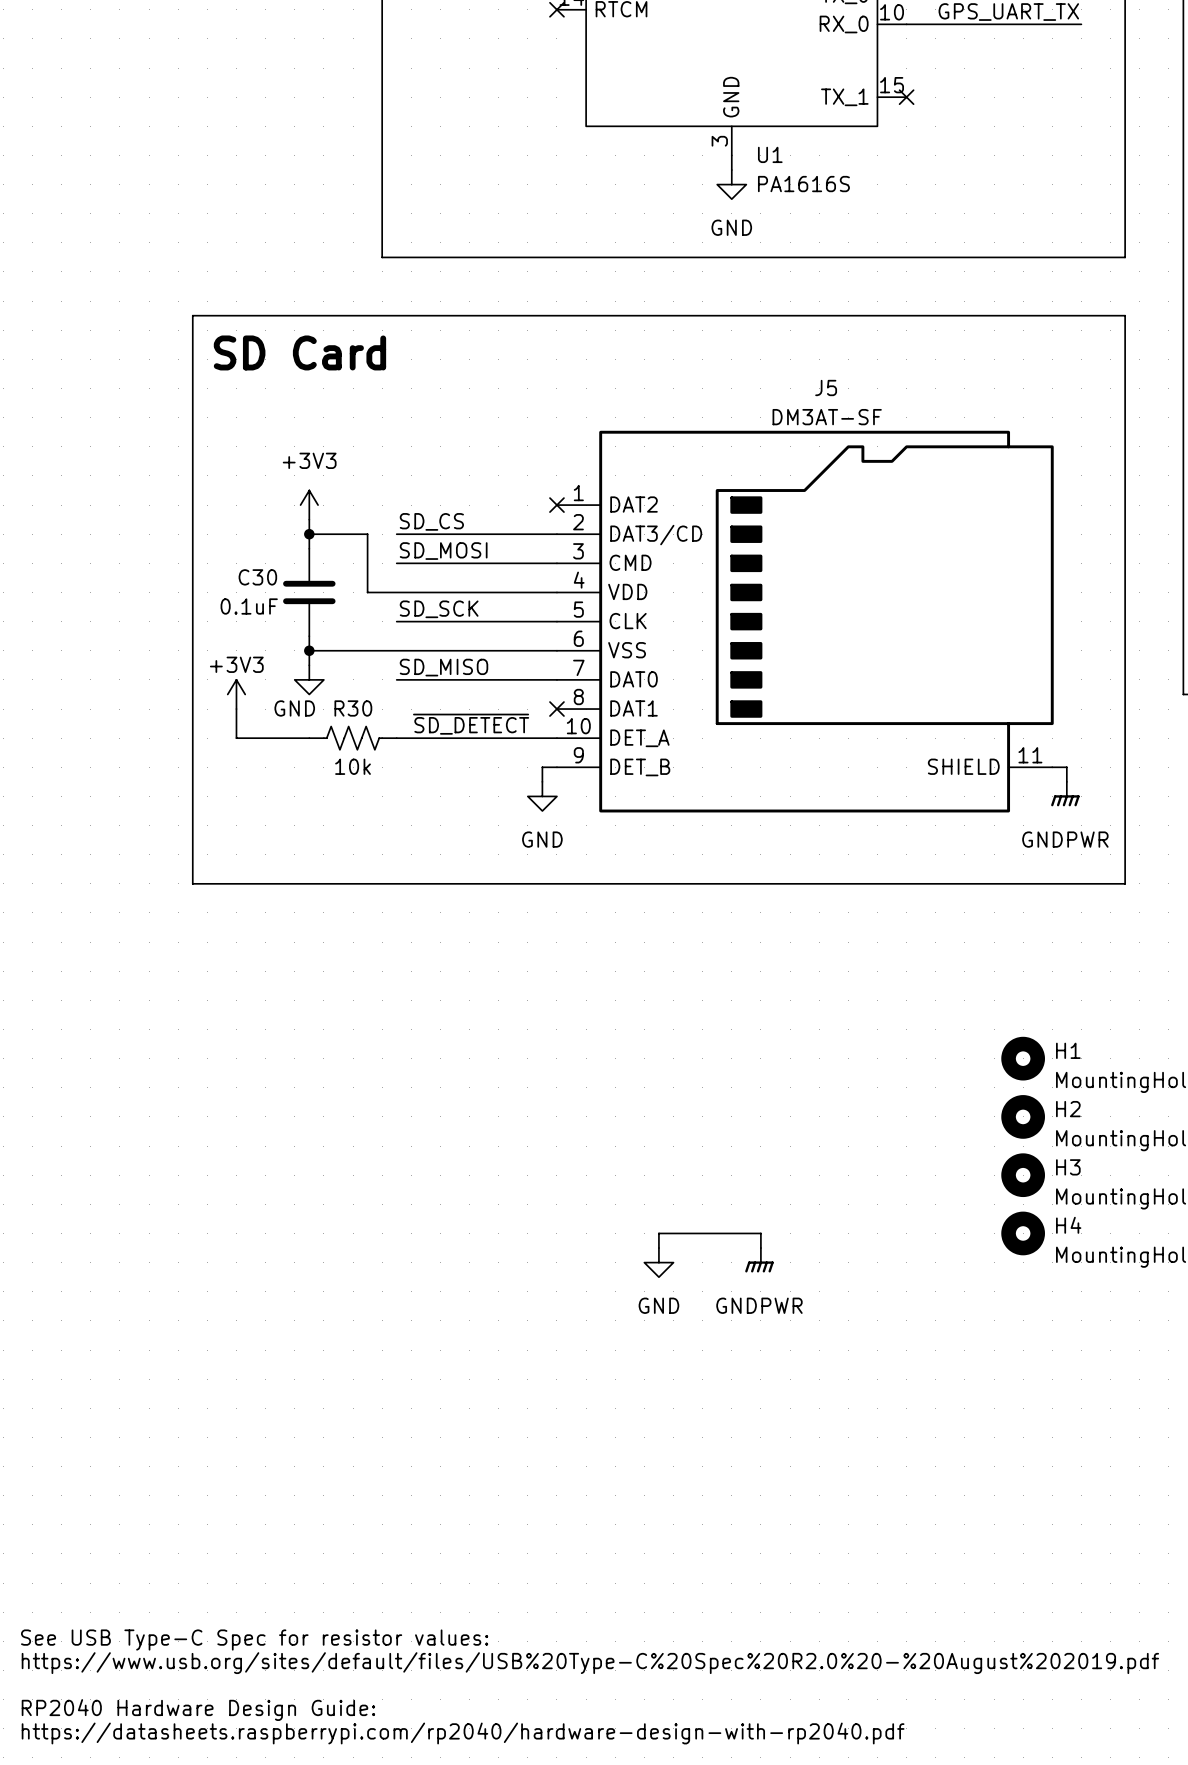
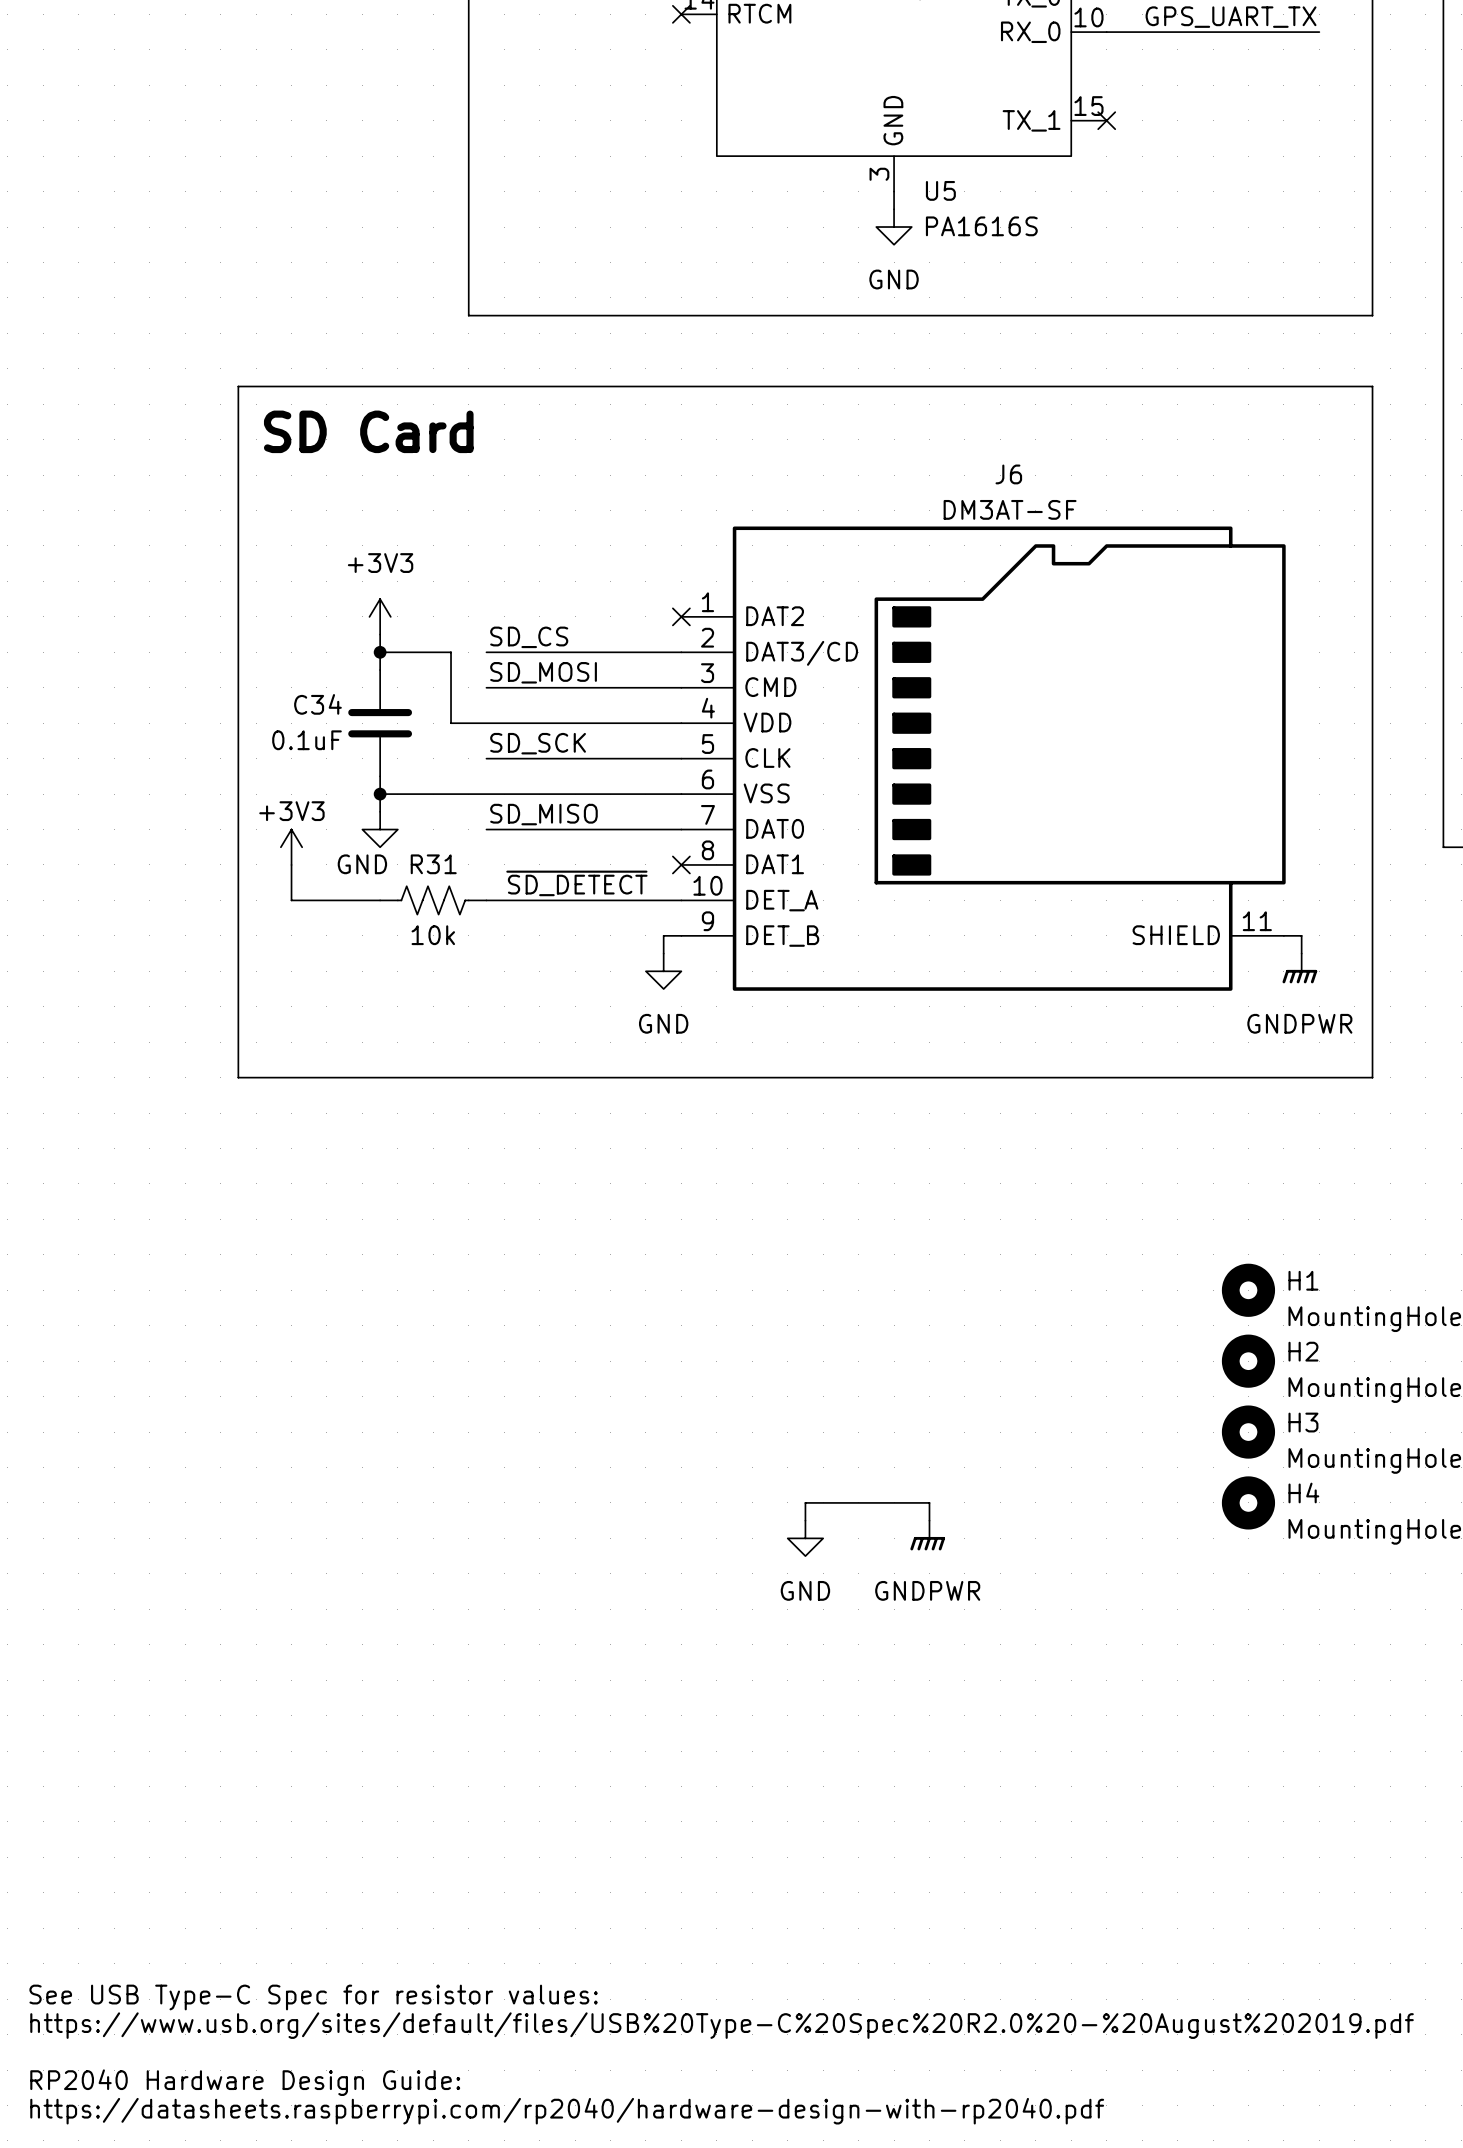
U1 name: U1 (770, 154) -> U5 (940, 190)
J5 name: J5 (826, 387) -> J6 (1008, 474)
C30 name: C30 (257, 577) -> C34 (317, 704)
R30 name: R30 (353, 708) -> R31 (433, 864)

